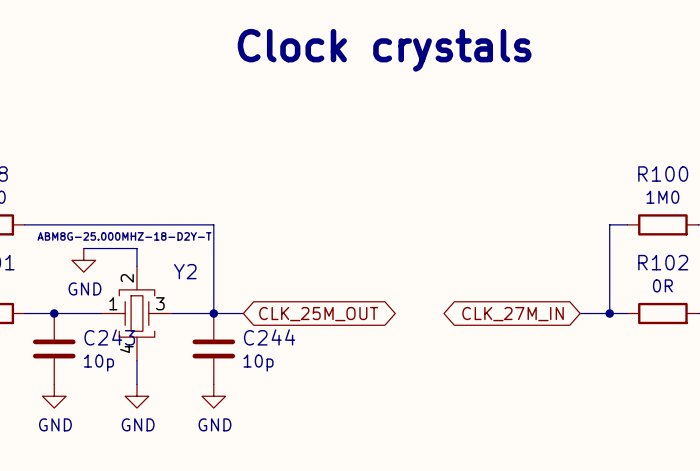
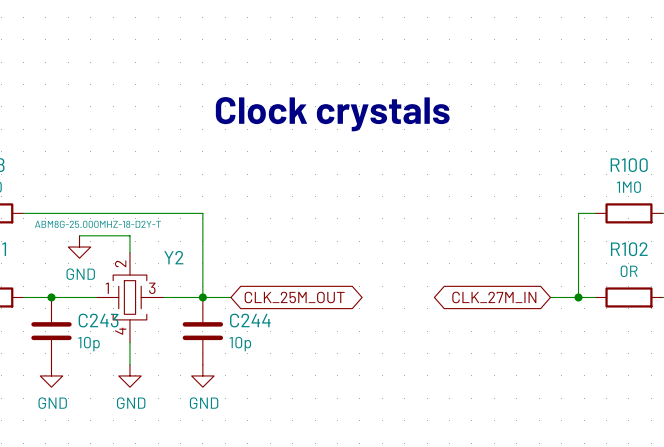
text position: Clock crystals (384, 50) -> Clock crystals (332, 114)

